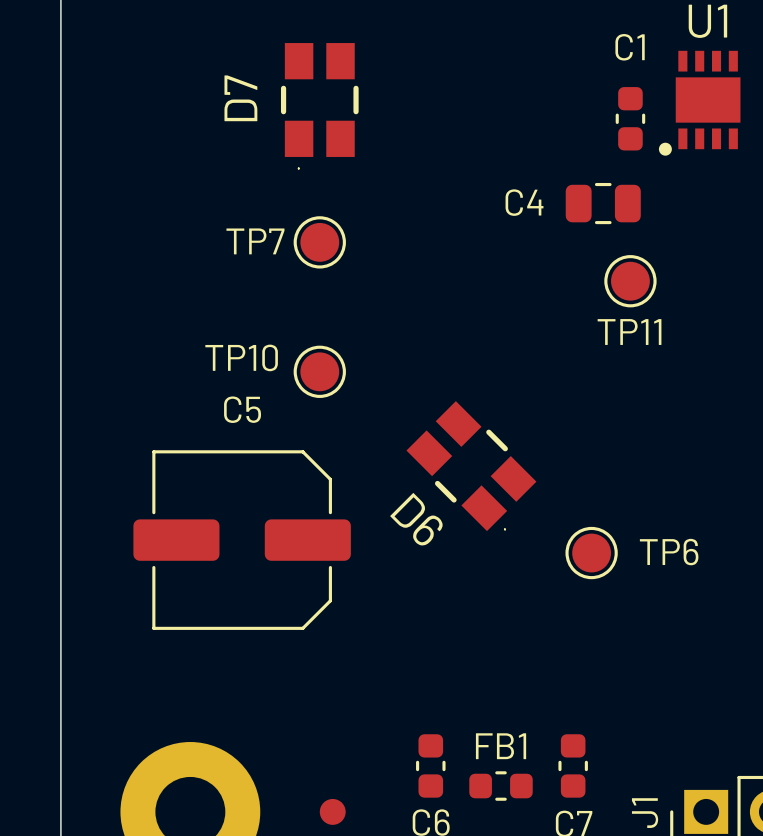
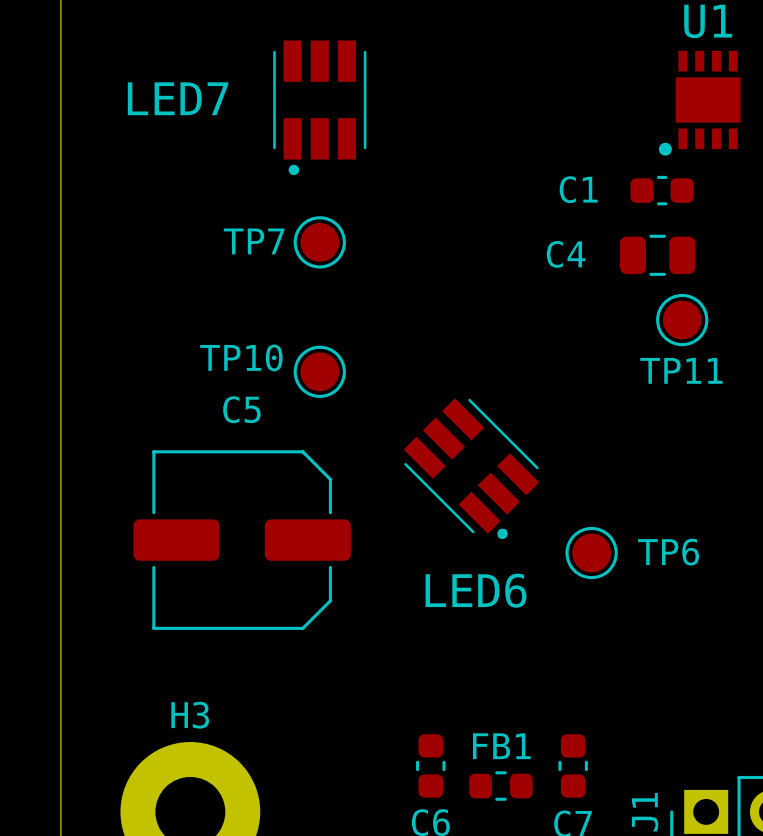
C1 name position: C1 (630, 47) -> C1 (578, 189)
D7: (319, 106) -> none
LED7: none -> (319, 107)
C1 rotation: 0° (630, 118) -> 90° clockwise (662, 190)
C1 position: (630, 118) -> (662, 190)
C4 name position: C4 (524, 202) -> C4 (566, 254)
C4 position: (603, 203) -> (657, 255)
TP11 position: (630, 281) -> (682, 320)
D6: (471, 466) -> none
LED6: none -> (471, 468)
H3 name: none -> H3 (190, 715)
part: (332, 811) -> none

